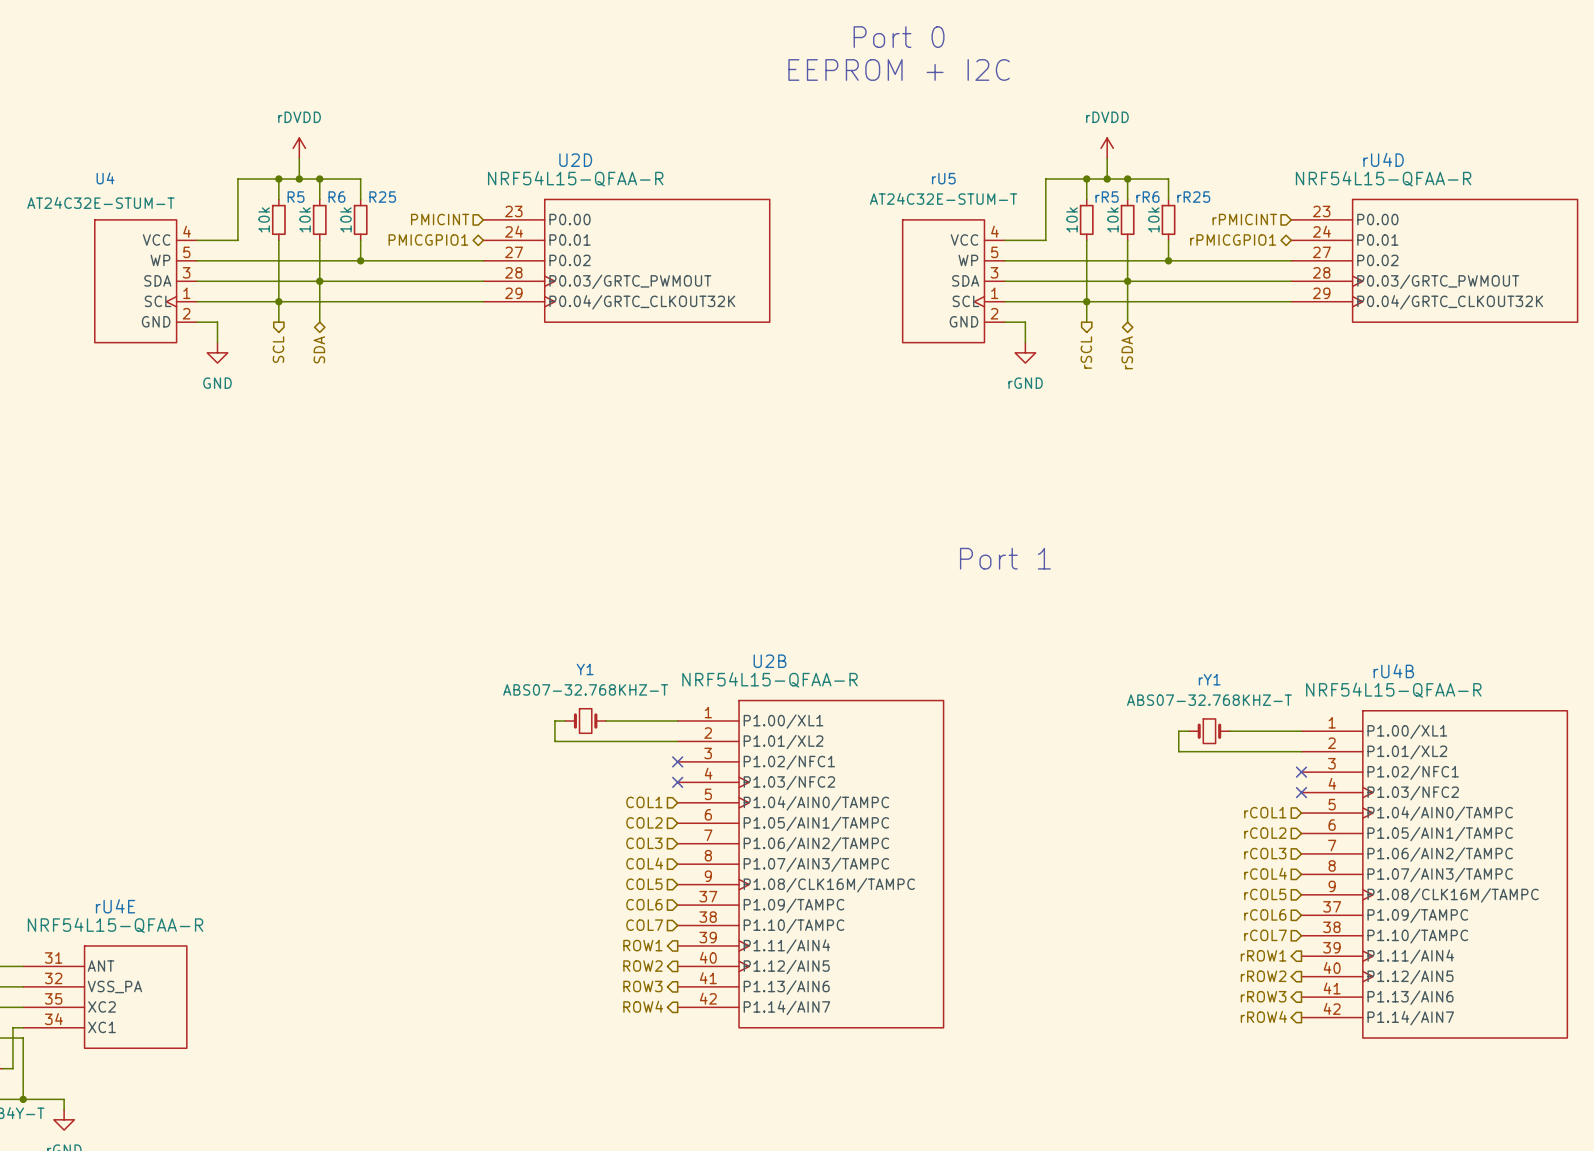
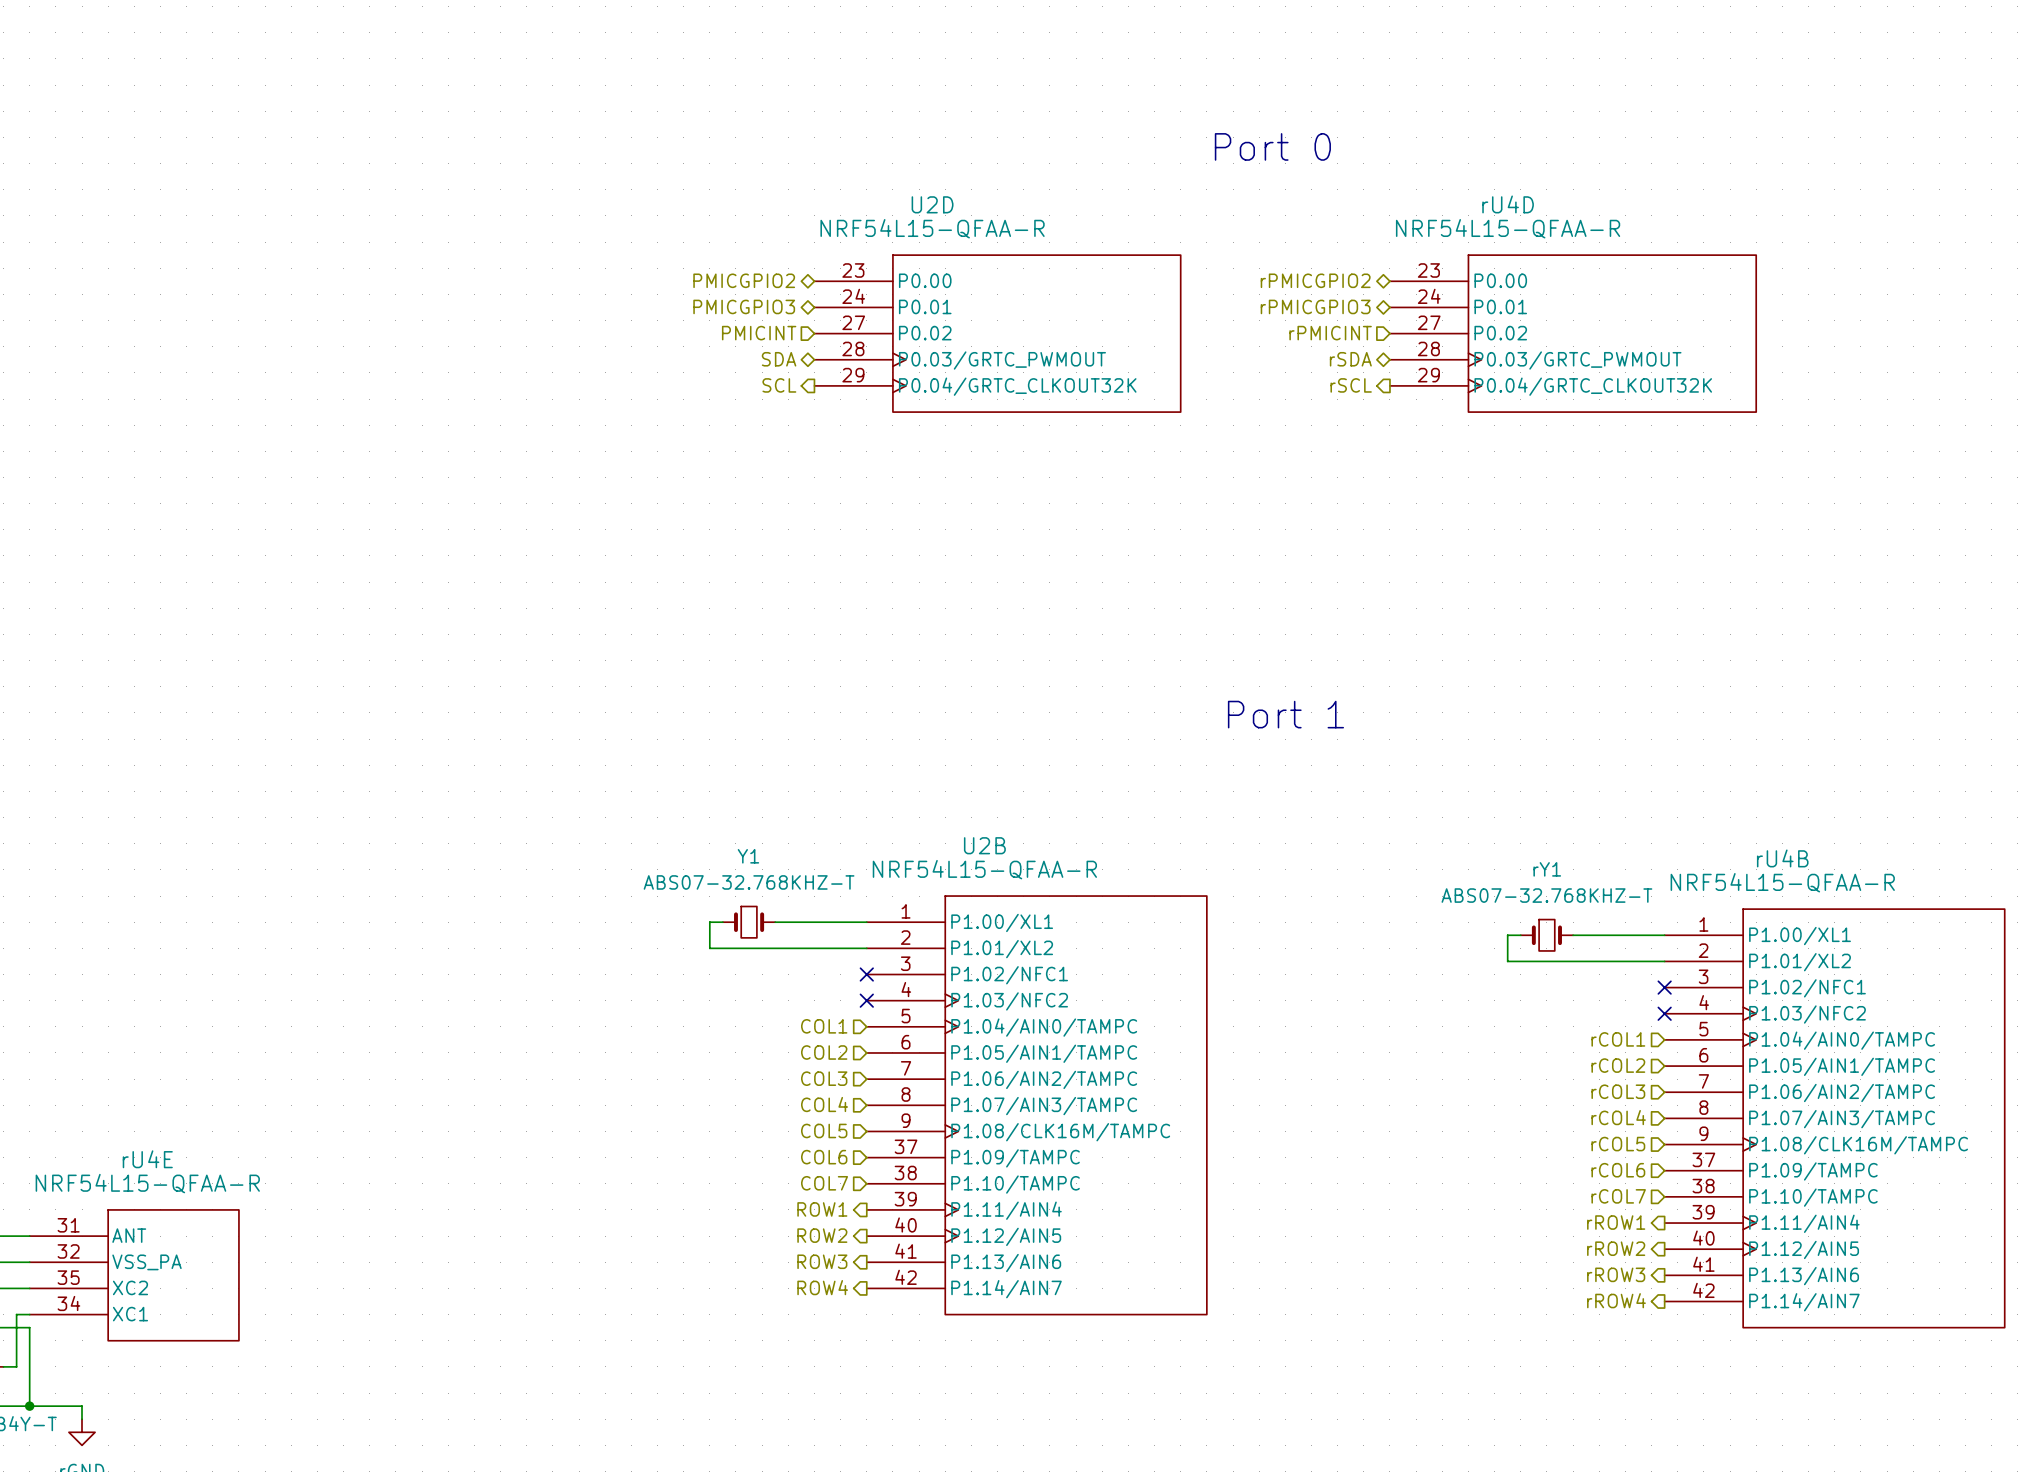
text position: Port 0 (899, 37) -> Port 0 (1272, 146)
text: EEPROM + I2C (899, 69) -> none
power symbol: rDVDD (299, 148) -> none
power symbol: rDVDD (1107, 148) -> none
wire: (299, 158) (299, 179) -> none
wire: (1107, 158) (1107, 179) -> none
wire: (278, 179) (278, 199) -> none
junction: (278, 179) -> none
junction: (299, 179) -> none
wire: (319, 179) (319, 199) -> none
junction: (319, 179) -> none
wire: (1086, 179) (1086, 199) -> none
junction: (1086, 179) -> none
junction: (1107, 179) -> none
wire: (1127, 179) (1127, 199) -> none
junction: (1127, 179) -> none
wire: (360, 199) (360, 179) (237, 179) (237, 240) (197, 240) -> none
wire: (1168, 199) (1168, 179) (1045, 179) (1045, 240) (1004, 240) -> none
R5: 10k (278, 219) -> none
R6: 10k (319, 219) -> none
R25: 10k (360, 219) -> none
hierarchical label position: PMICINT (440, 219) -> PMICINT (759, 333)
hierarchical label: none -> PMICGPIO2 (744, 280)
hierarchical label: none -> rPMICGPIO2 (1315, 280)
rR5: 10k (1086, 219) -> none
rR6: 10k (1127, 219) -> none
rR25: 10k (1168, 219) -> none
hierarchical label: rPMICINT (1244, 219) -> none
hierarchical label: PMICGPIO1 (428, 239) -> none
hierarchical label: none -> PMICGPIO3 (744, 306)
hierarchical label: none -> rPMICGPIO3 (1315, 306)
hierarchical label: rPMICGPIO1 (1233, 239) -> none
wire: (278, 240) (278, 322) -> none
wire: (319, 240) (319, 322) -> none
wire: (360, 240) (360, 260) -> none
wire: (1086, 240) (1086, 322) -> none
wire: (1127, 240) (1127, 322) -> none
wire: (1168, 240) (1168, 260) -> none
wire: (197, 260) (483, 260) -> none
junction: (360, 260) -> none
U2D position: (626, 260) -> (997, 333)
wire: (1004, 260) (1291, 260) -> none
hierarchical label: none -> rPMICINT (1330, 333)
junction: (1168, 260) -> none
rU4D position: (1434, 260) -> (1573, 333)
hierarchical label: none -> SDA (779, 359)
U4: AT24C32E-STUM-T (145, 281) -> none
wire: (197, 281) (483, 281) -> none
junction: (319, 281) -> none
rU5: AT24C32E-STUM-T (953, 281) -> none
wire: (1004, 281) (1291, 281) -> none
junction: (1127, 281) -> none
wire: (197, 301) (483, 301) -> none
junction: (278, 301) -> none
hierarchical label: none -> SCL (779, 385)
wire: (1004, 301) (1291, 301) -> none
junction: (1086, 301) -> none
wire: (197, 322) (217, 322) (217, 342) -> none
wire: (1004, 322) (1025, 322) (1025, 342) -> none
hierarchical label: SCL (278, 349) -> none
hierarchical label: SDA (319, 349) -> none
power symbol: GND (217, 352) -> none
power symbol: rGND (1025, 352) -> none
hierarchical label rotation: 0° (1086, 352) -> 90° clockwise (1351, 385)
hierarchical label position: rSCL (1086, 352) -> rSCL (1351, 385)
hierarchical label rotation: 0° (1127, 352) -> 90° clockwise (1350, 359)
hierarchical label position: rSDA (1127, 352) -> rSDA (1350, 359)

